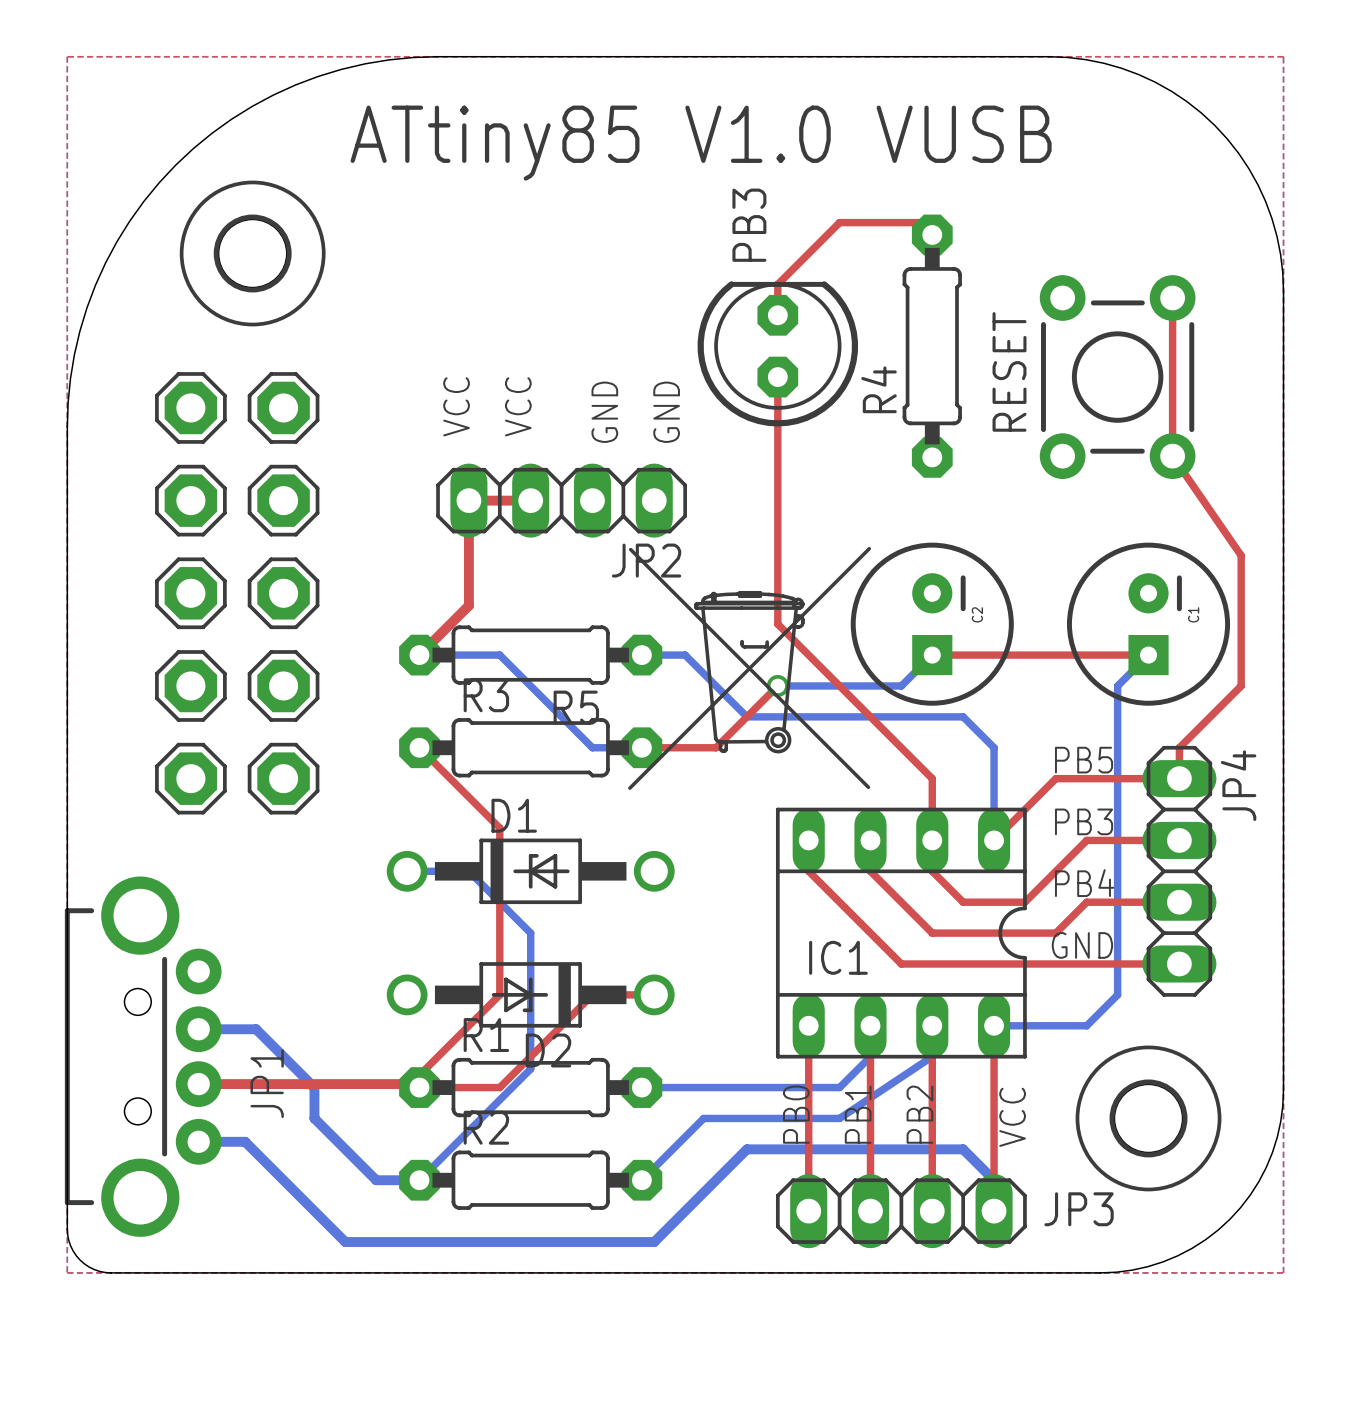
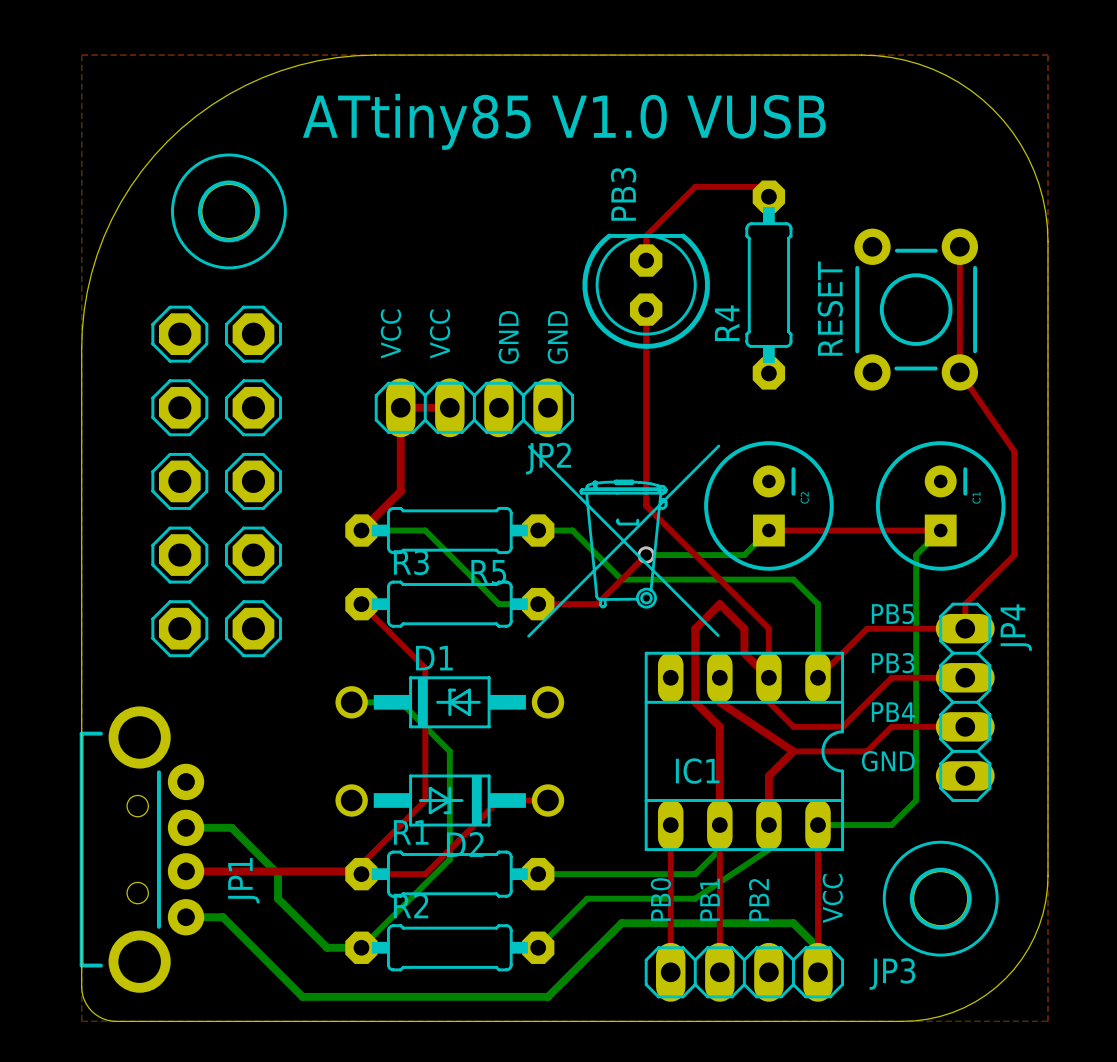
top track: (808, 840) (808, 871) (901, 963) (1179, 963) -> none
top track: none -> (768, 677) (744, 653) (744, 628) (719, 604) (695, 628) (695, 702) (719, 726) (719, 825)
top track: (870, 871) (932, 933) (963, 933) -> (719, 702) (793, 751) (768, 775) (768, 825)
top track: (932, 1025) (932, 1211) -> none

